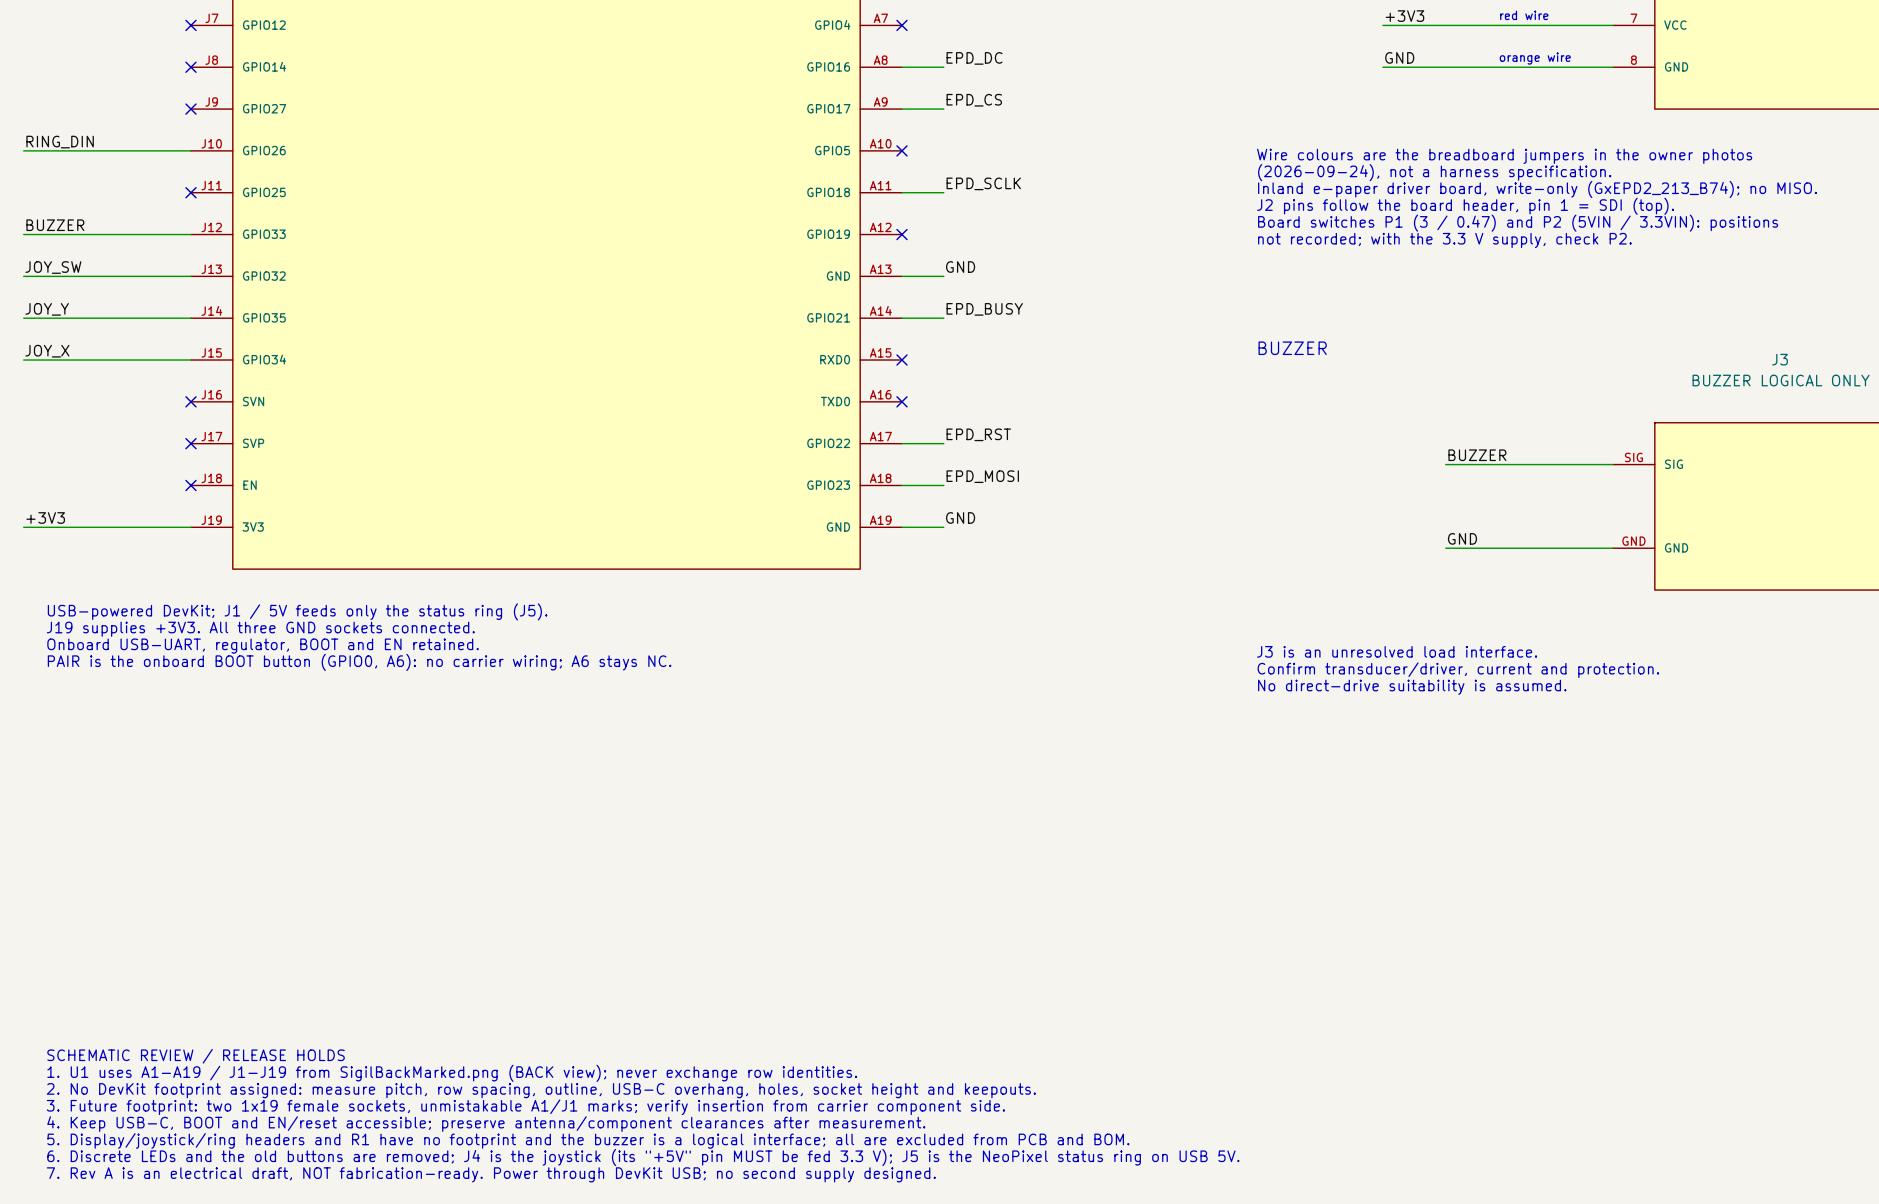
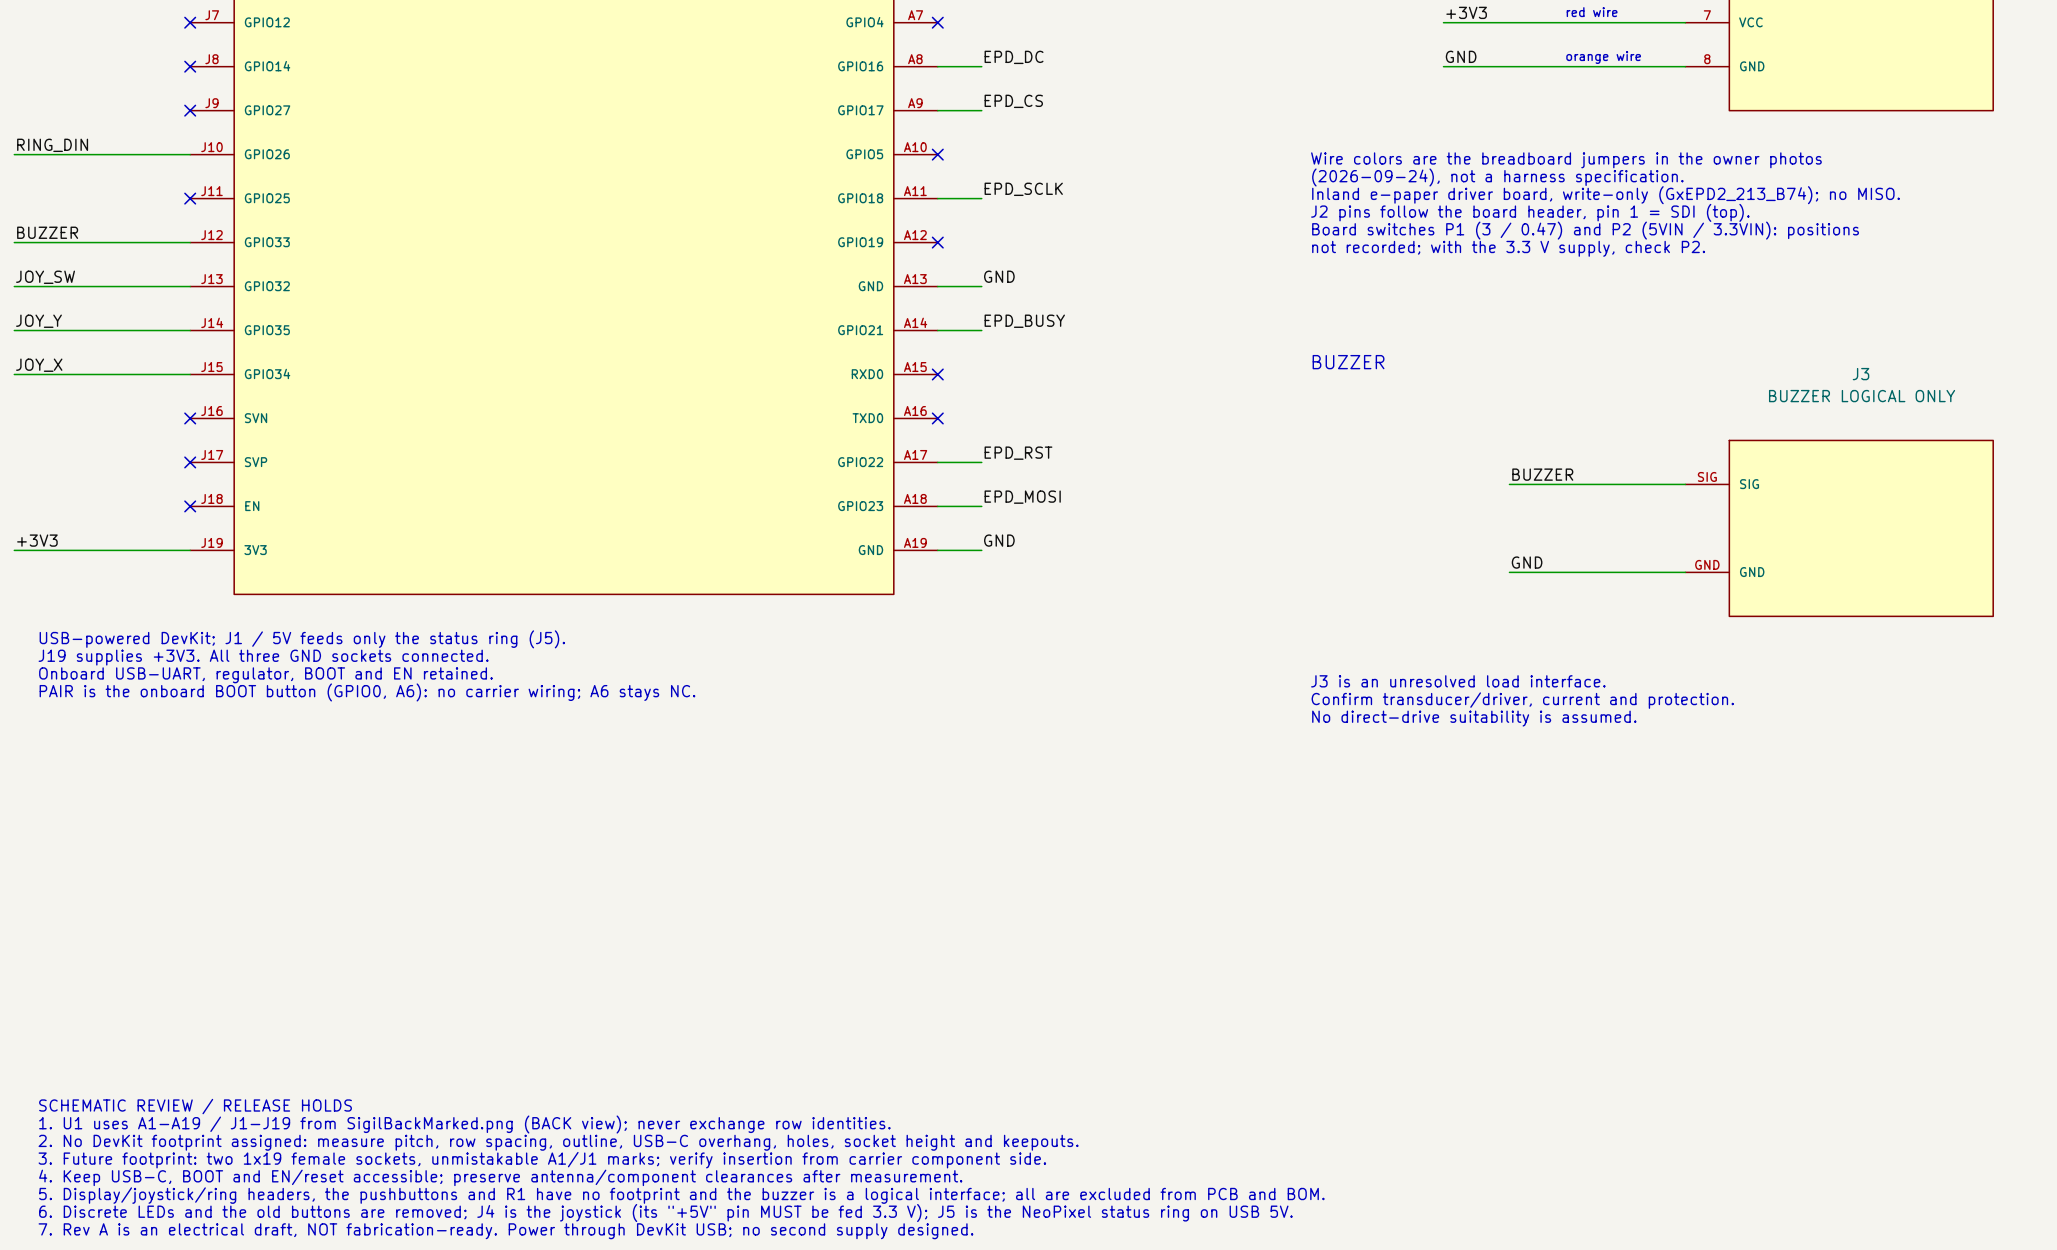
text: Wire colours are the breadboard jumpers in the owner photos (1504, 156) -> Wire colors are the breadboard jumpers in the owner photos (1566, 160)
text: 5. Display/joystick/ring headers and R1 have no footprint and the buzzer is a logical interface; all are excluded from PCB and BOM. (588, 1140) -> 5. Display/joystick/ring headers, the pushbuttons and R1 have no footprint and the buzzer is a logical interface; all are excluded from PCB and BOM. (681, 1195)

